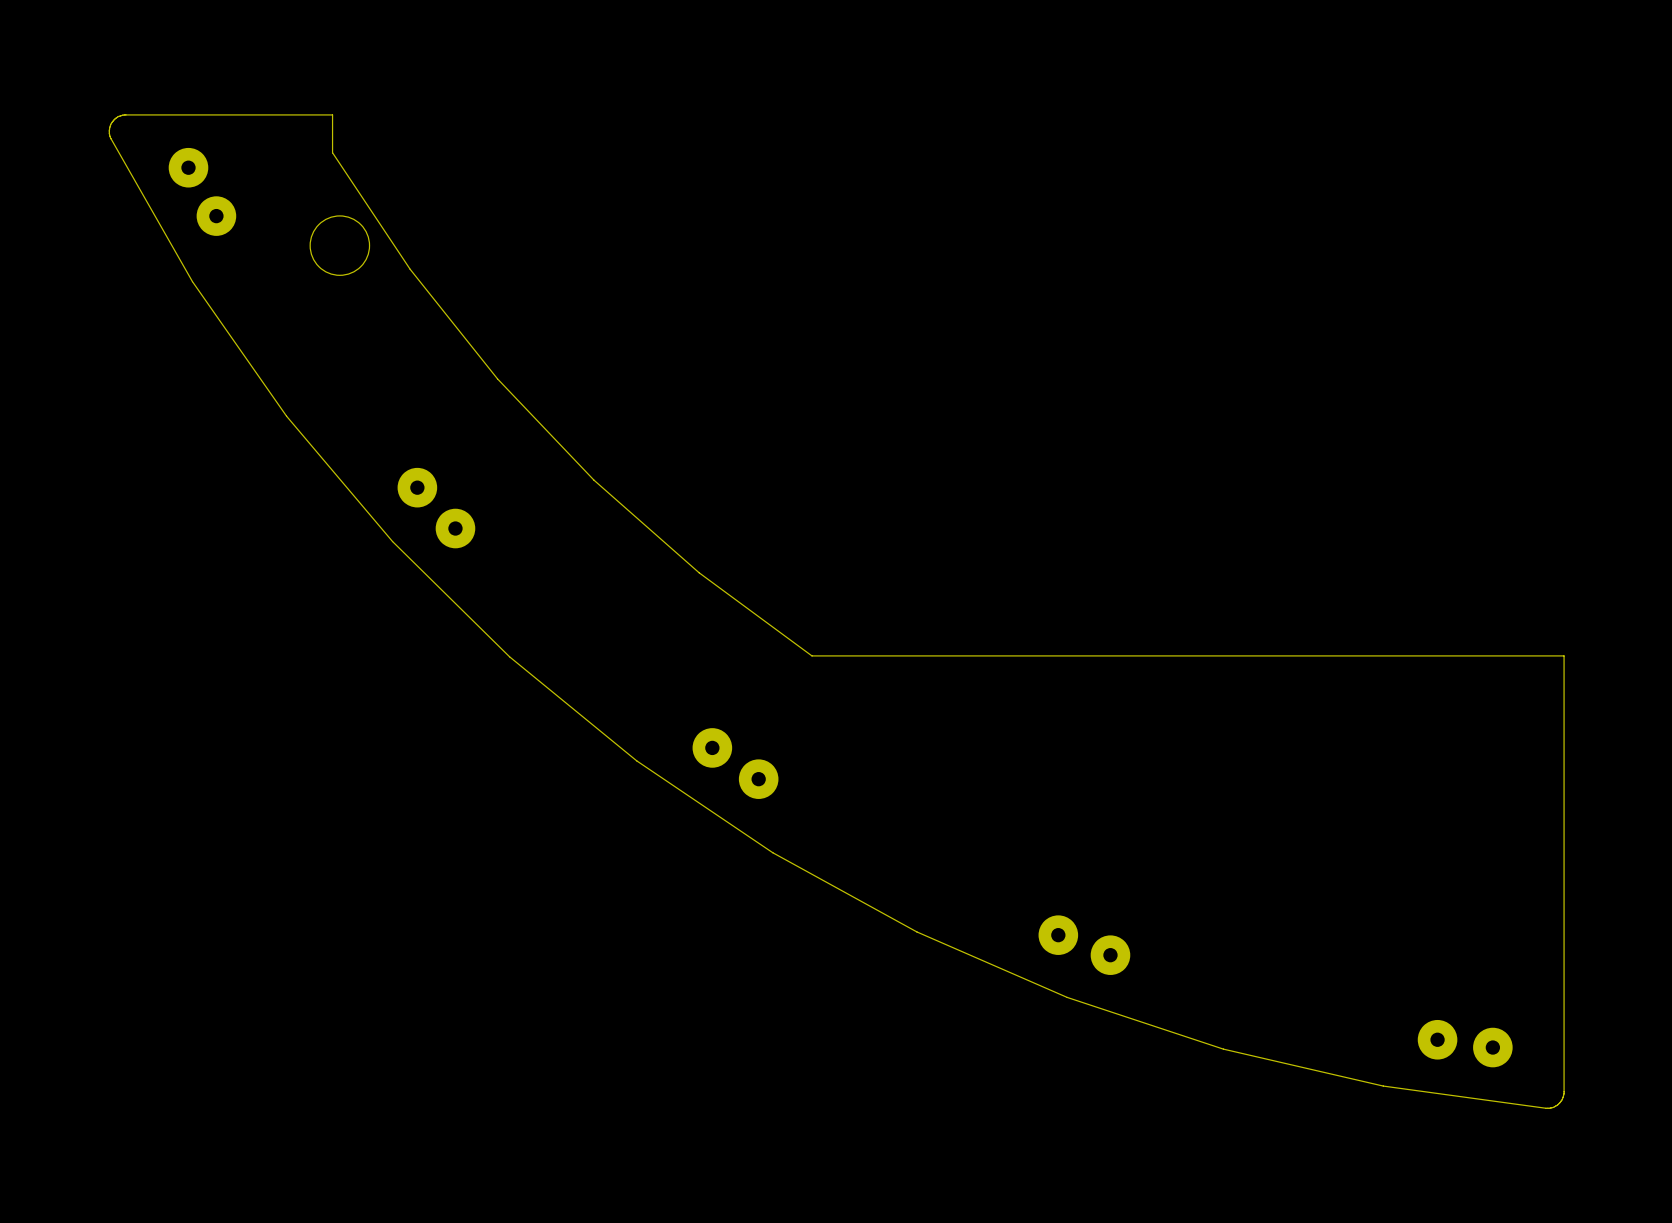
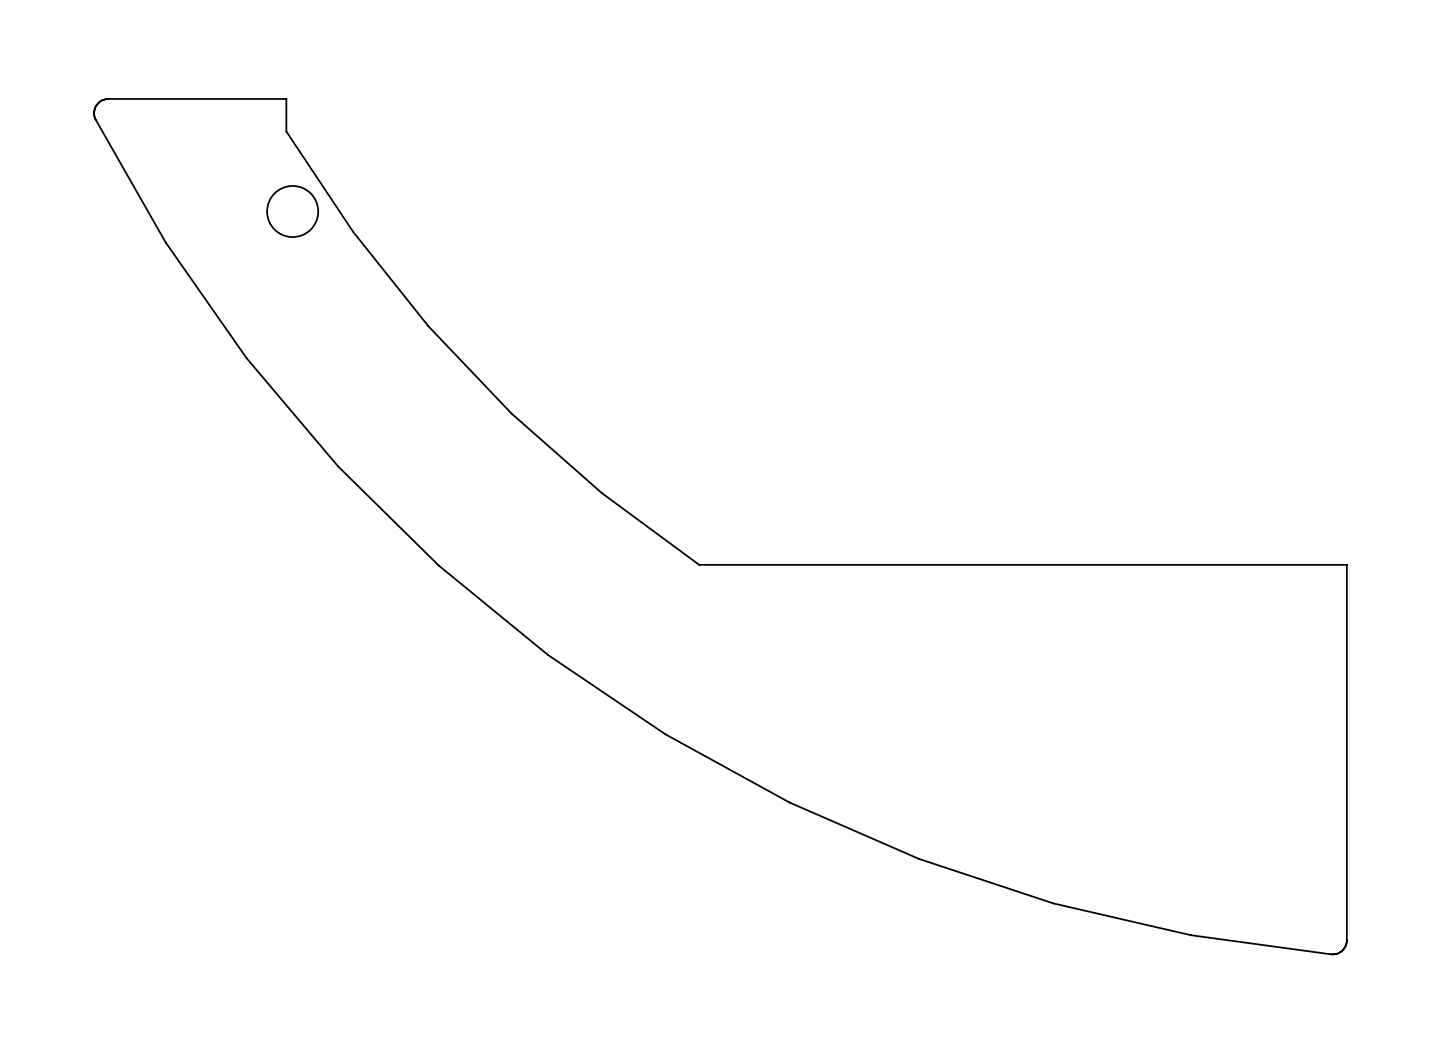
part: (202, 191) -> none
part: (436, 508) -> none
part: (735, 763) -> none
part: (1084, 945) -> none
part: (1465, 1043) -> none

